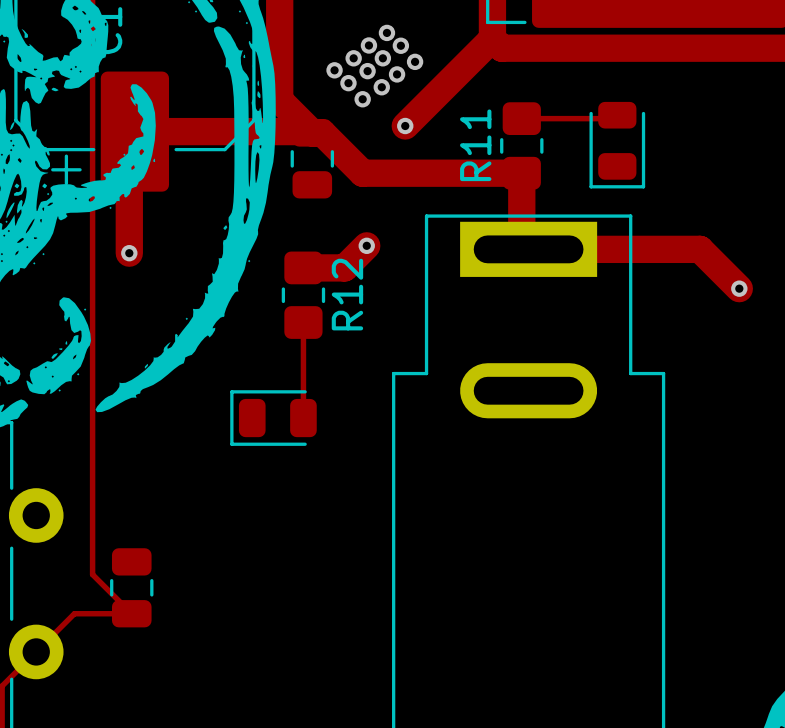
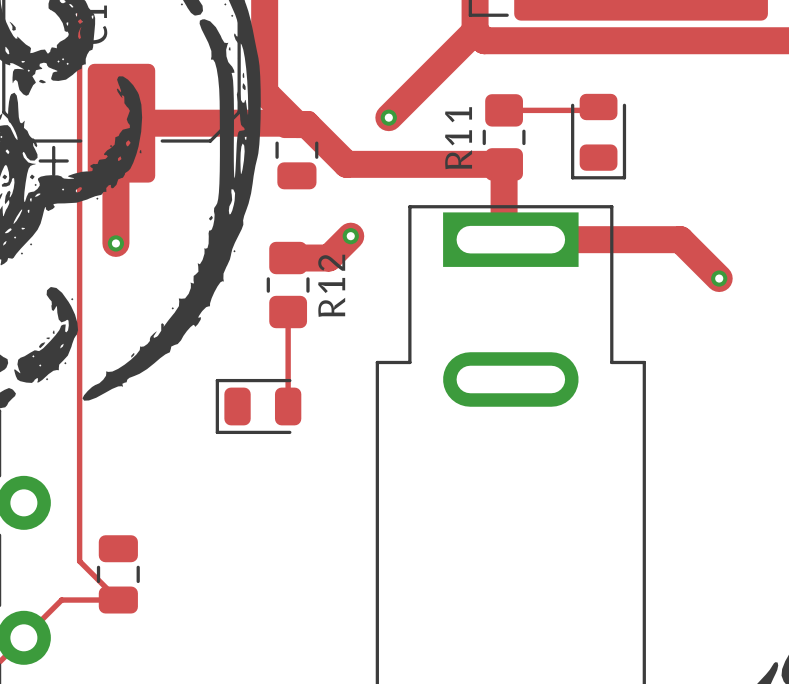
via: (386, 32) -> none
via: (368, 45) -> none
via: (400, 45) -> none
via: (353, 58) -> none
via: (382, 58) -> none
via: (415, 61) -> none
via: (334, 70) -> none
via: (367, 71) -> none
via: (397, 74) -> none
via: (348, 83) -> none
via: (381, 87) -> none
via: (362, 99) -> none

